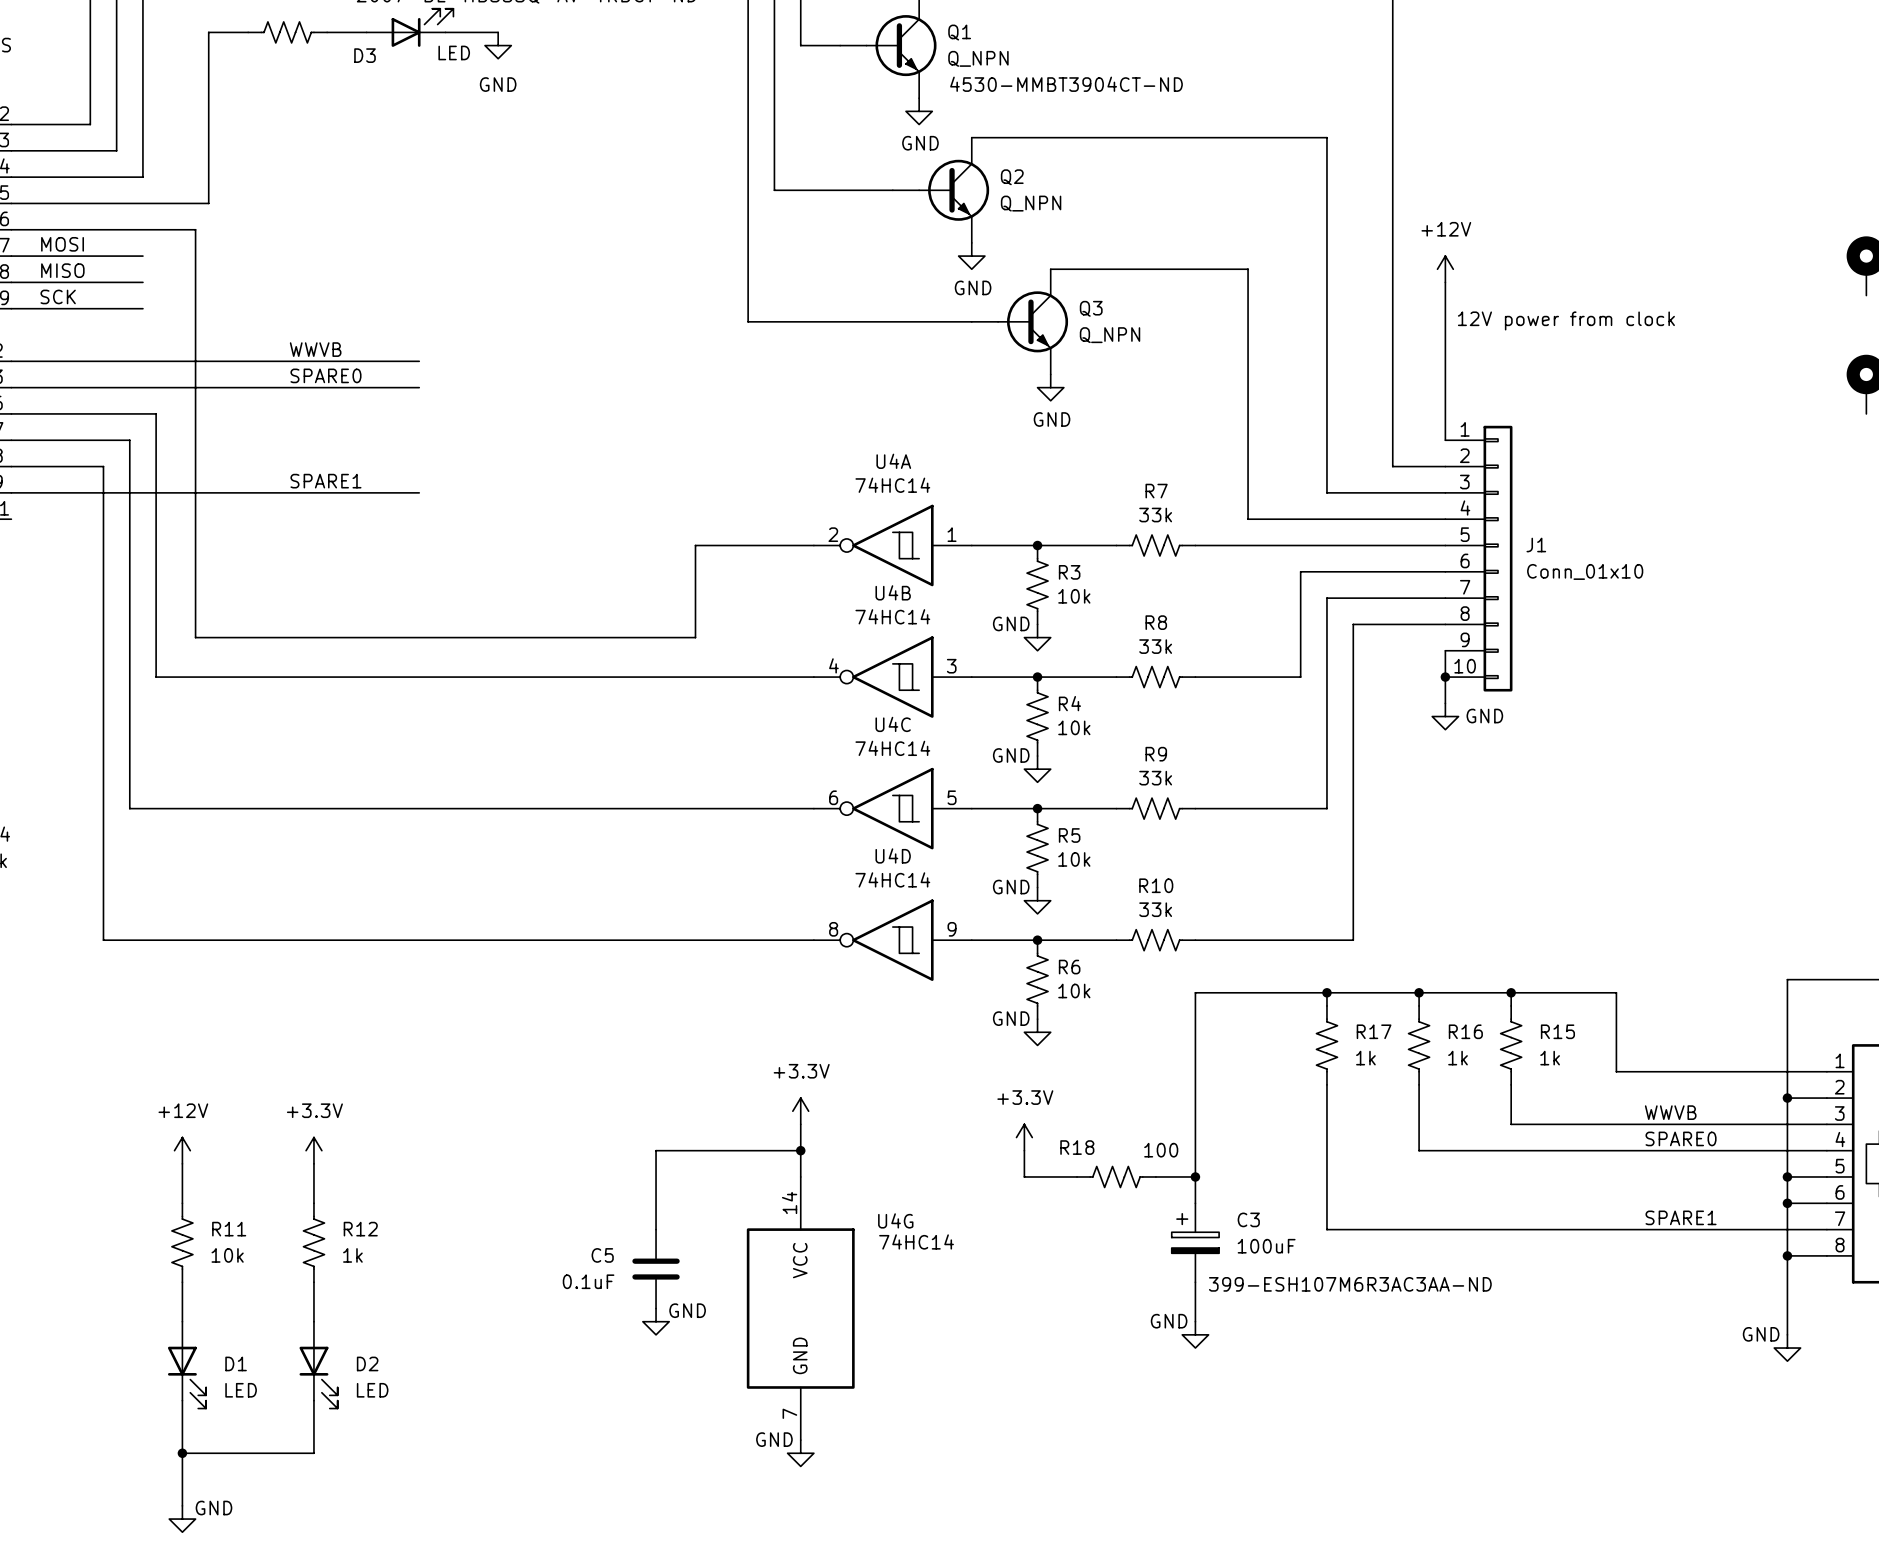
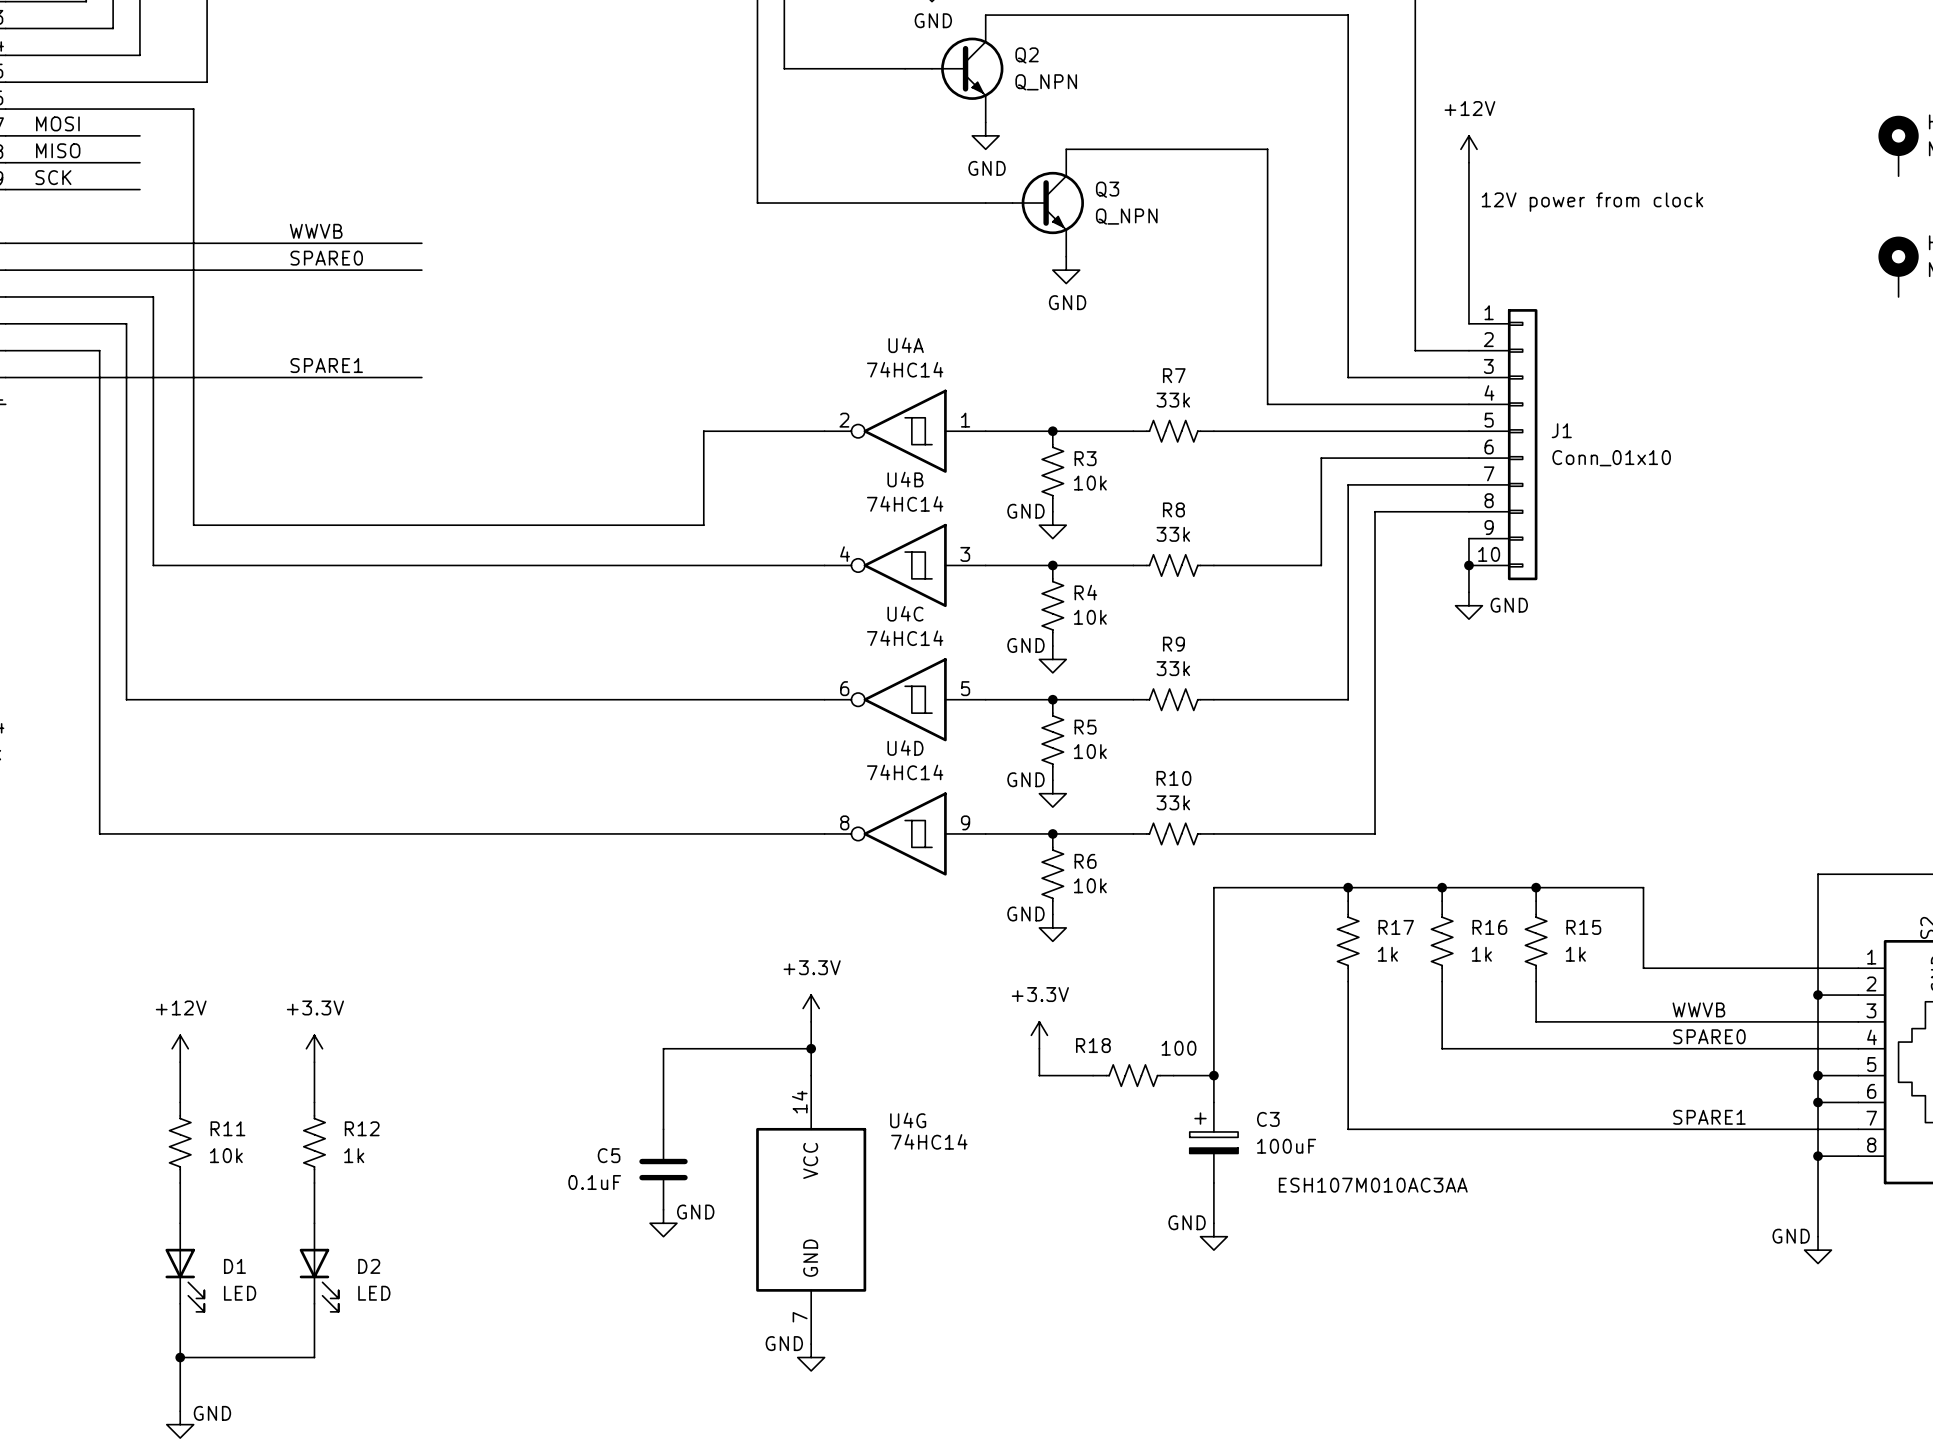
C3 text: 399-ESH107M6R3AC3AA-ND (1350, 1284) -> ESH107M010AC3AA (1373, 1185)

